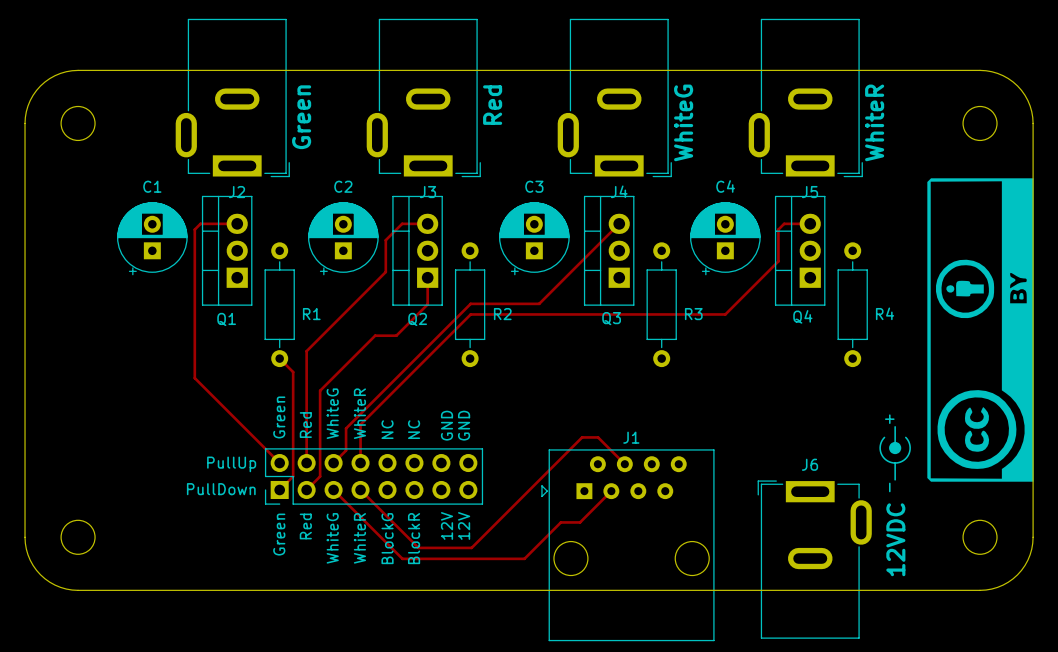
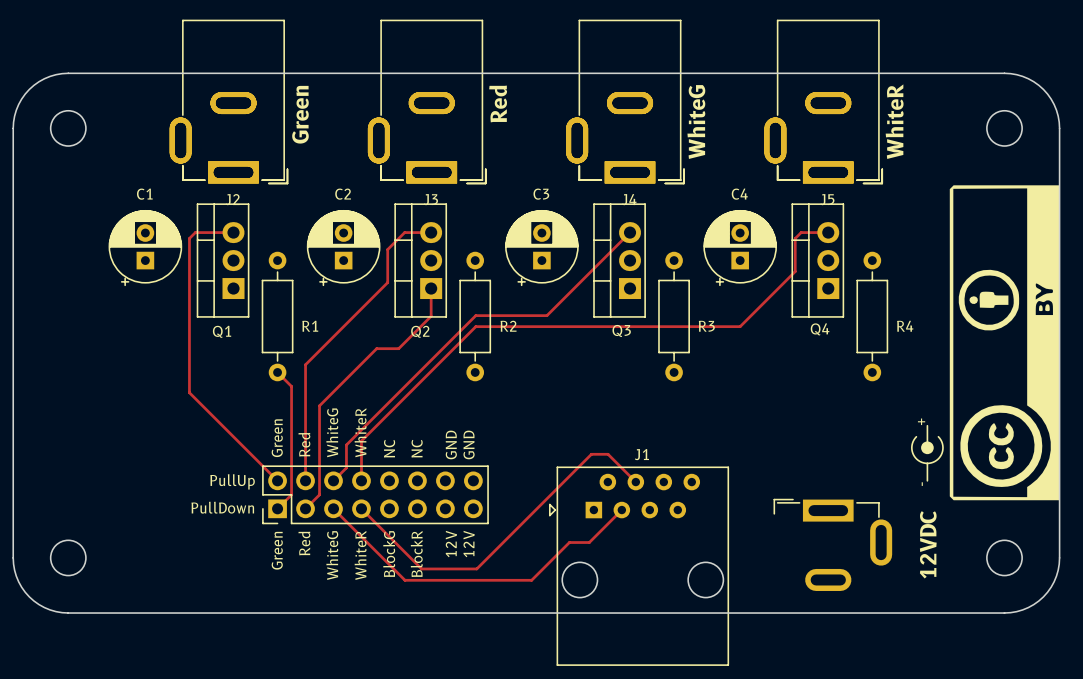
part: none -> (228, 138)
part: none -> (427, 138)
part: none -> (625, 138)
part: none -> (823, 138)
text position: + (889, 419) -> + (921, 421)
line: (895, 426) (895, 448) -> (927, 425) (927, 447)
line: (884, 437) (880, 445) (881, 454) (886, 460) (895, 463) (902, 461) (908, 454) (909, 445) (905, 437) -> (916, 436) (912, 443) (912, 452) (918, 460) (927, 463) (934, 461) (941, 454) (942, 445) (938, 436)
drawing position: (895, 448) -> (927, 447)
line: (895, 463) (895, 479) -> (927, 463) (927, 480)
text position: - (889, 487) -> - (922, 484)
part: none -> (832, 544)
text position: 12VDC (895, 539) -> 12VDC (928, 544)
J6: (814, 559) -> none

